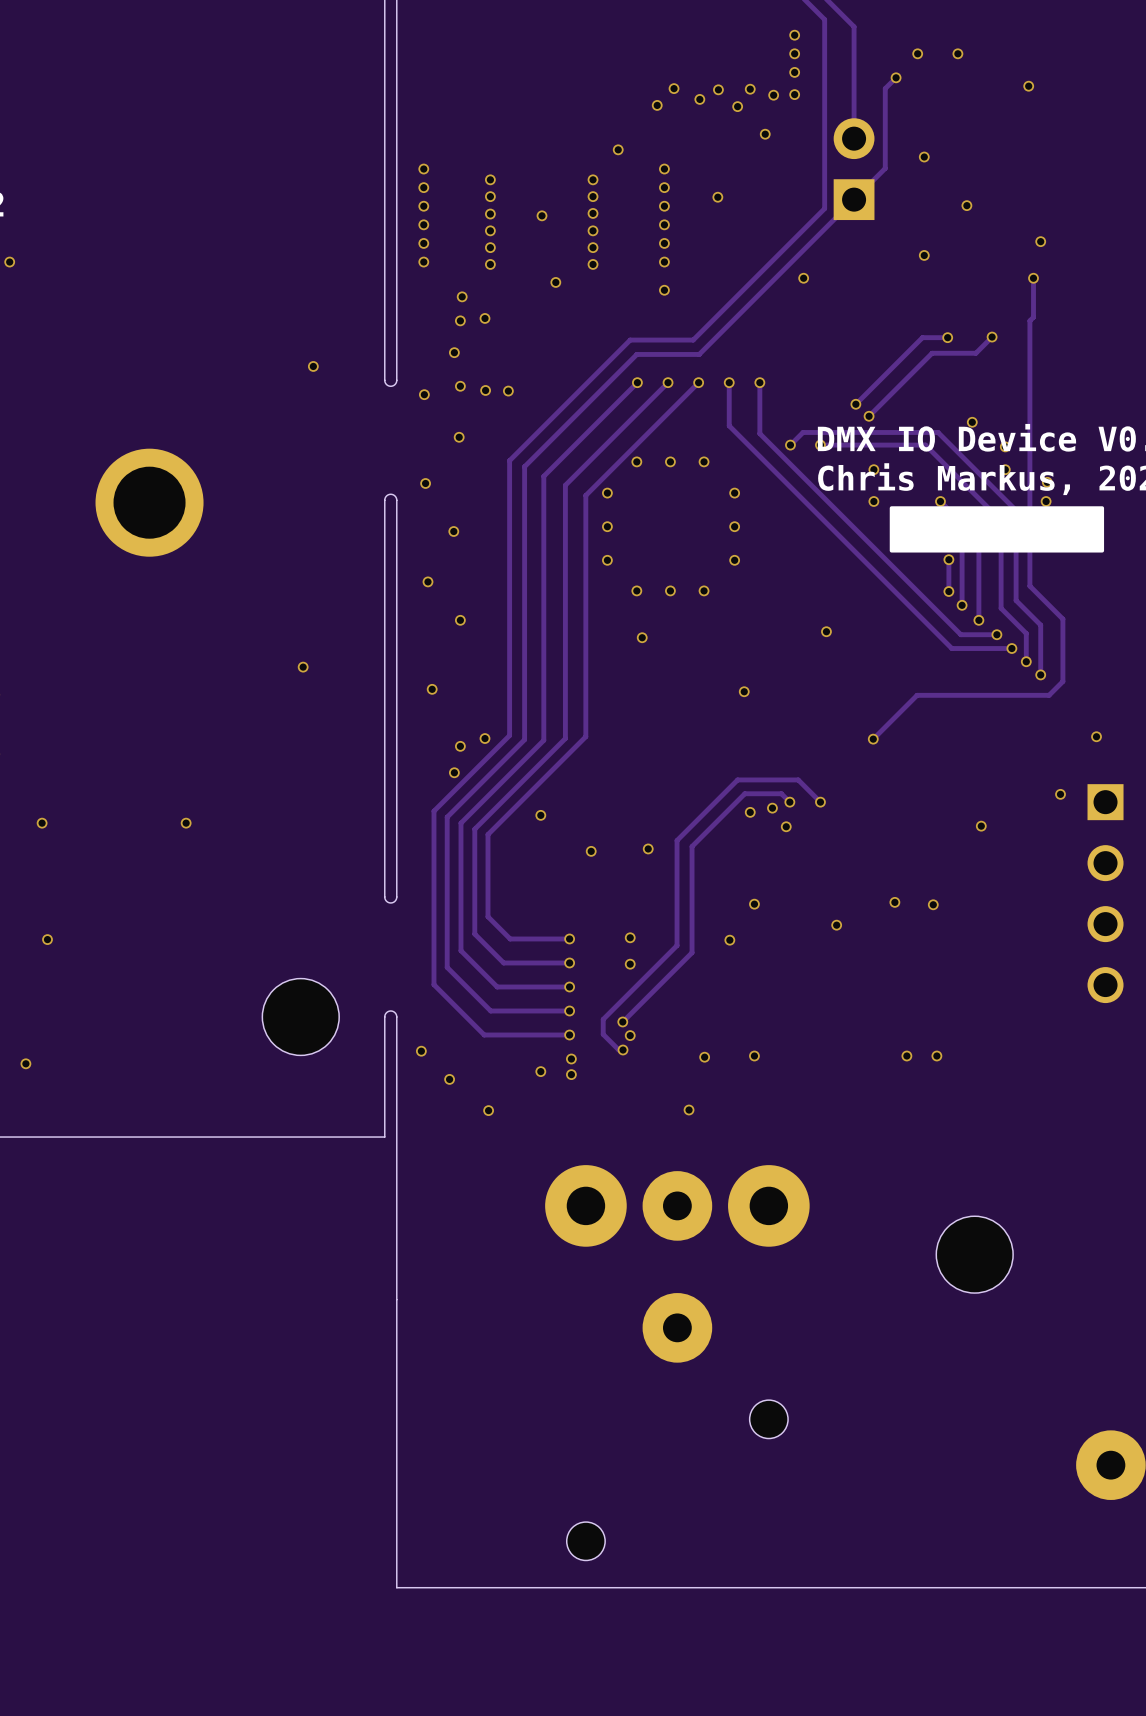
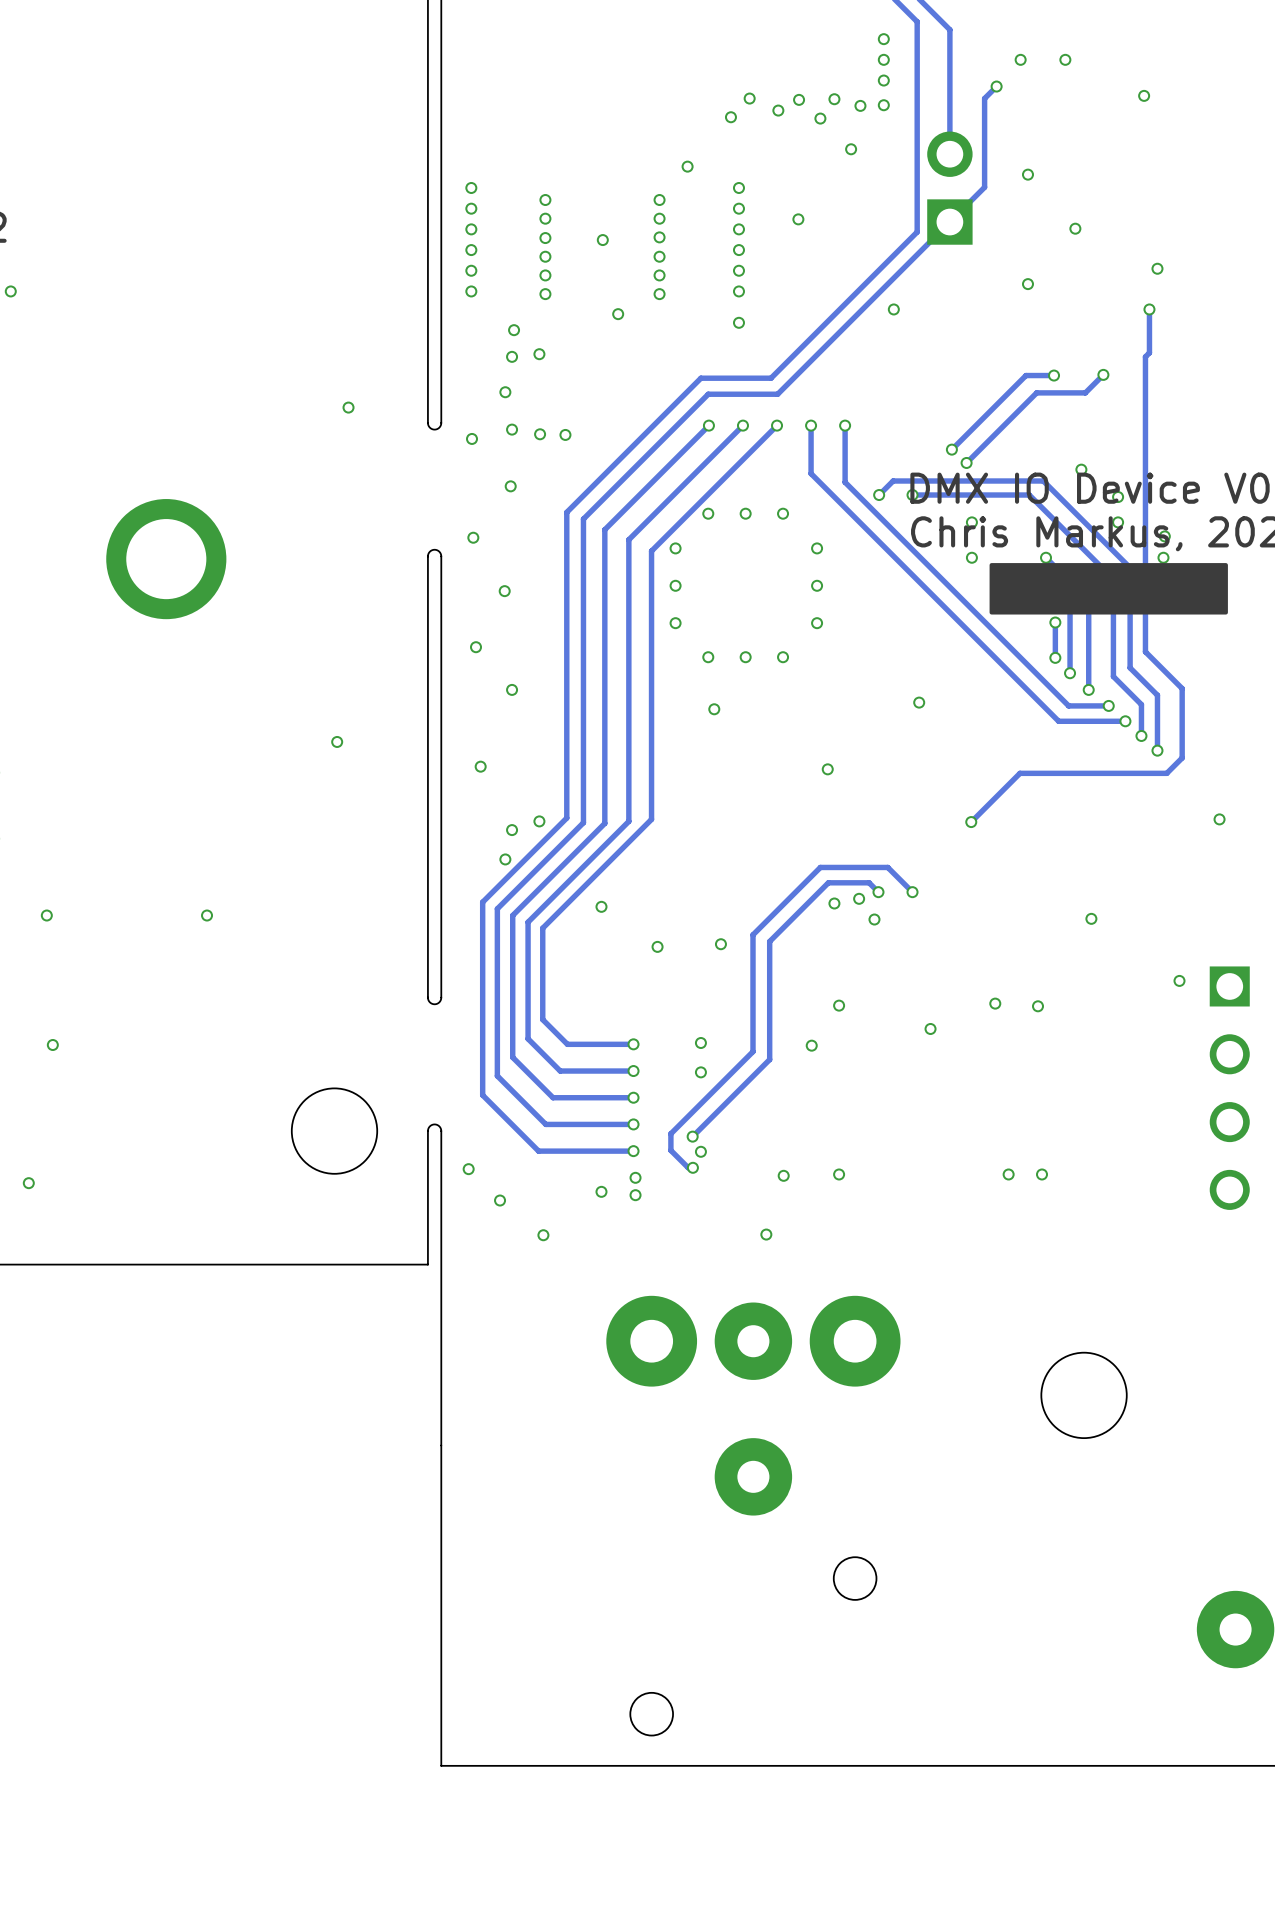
via position: (1060, 794) -> (1179, 980)
part position: (1105, 893) -> (1229, 1088)

